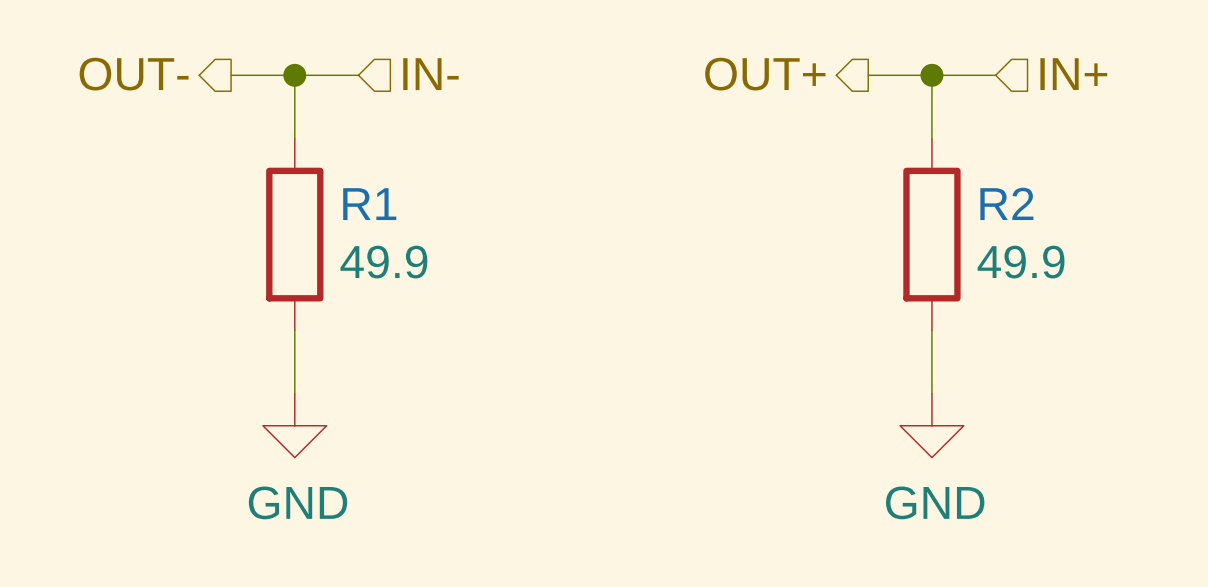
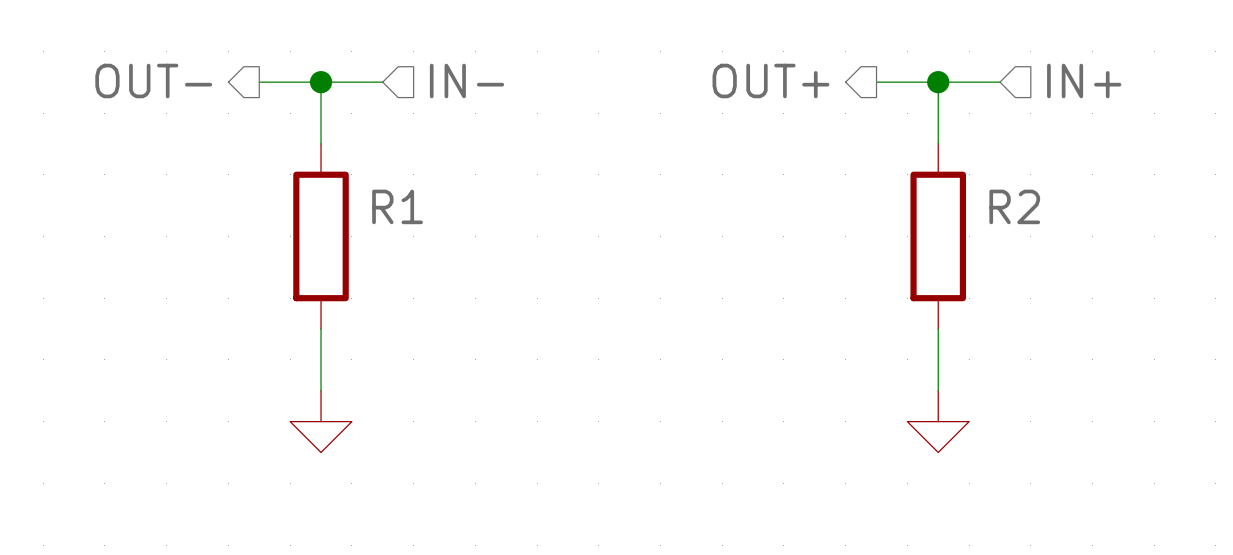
R1 value: 49.9 (383, 262) -> none
R2 value: 49.9 (1021, 262) -> none
power symbol text: GND (298, 502) -> none
power symbol text: GND (935, 502) -> none

